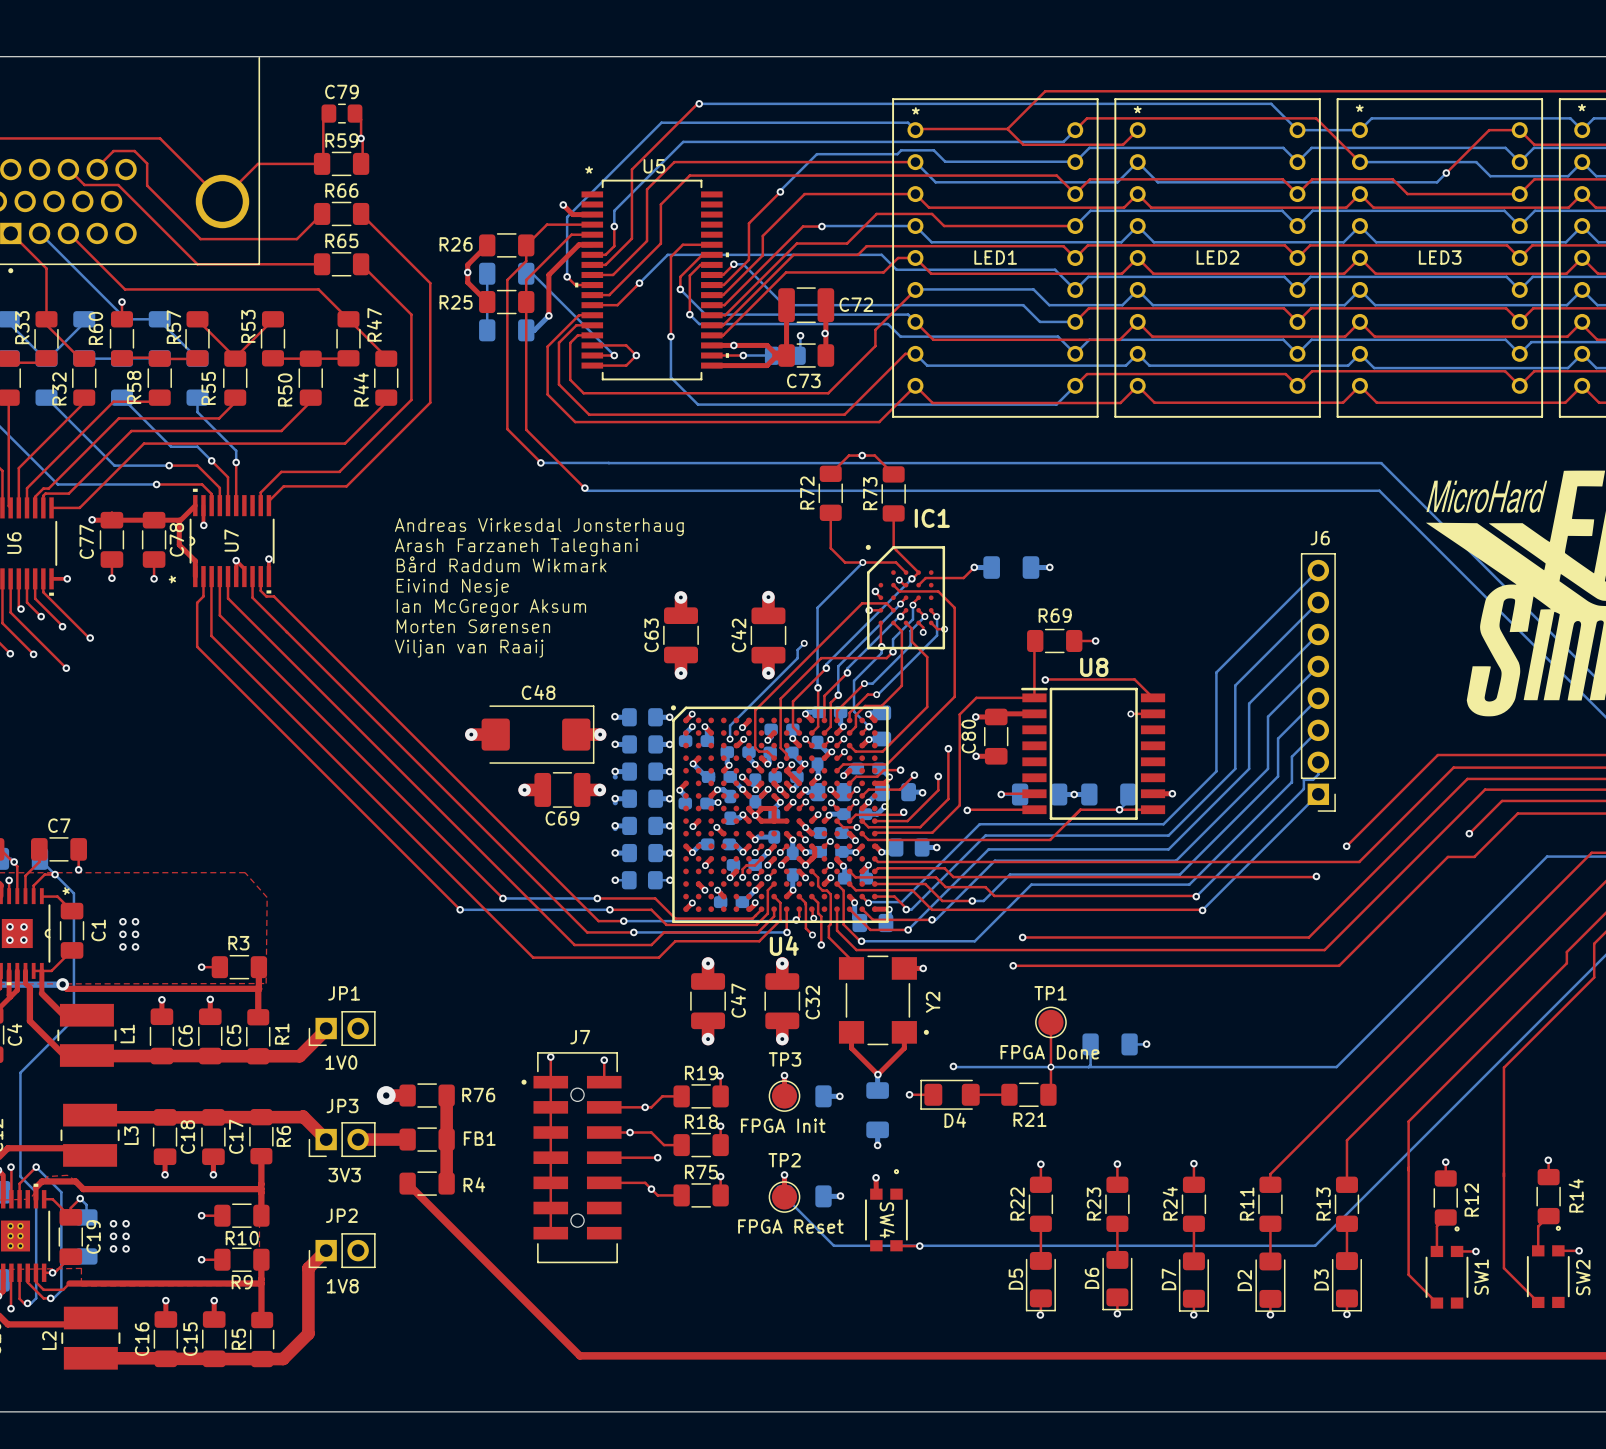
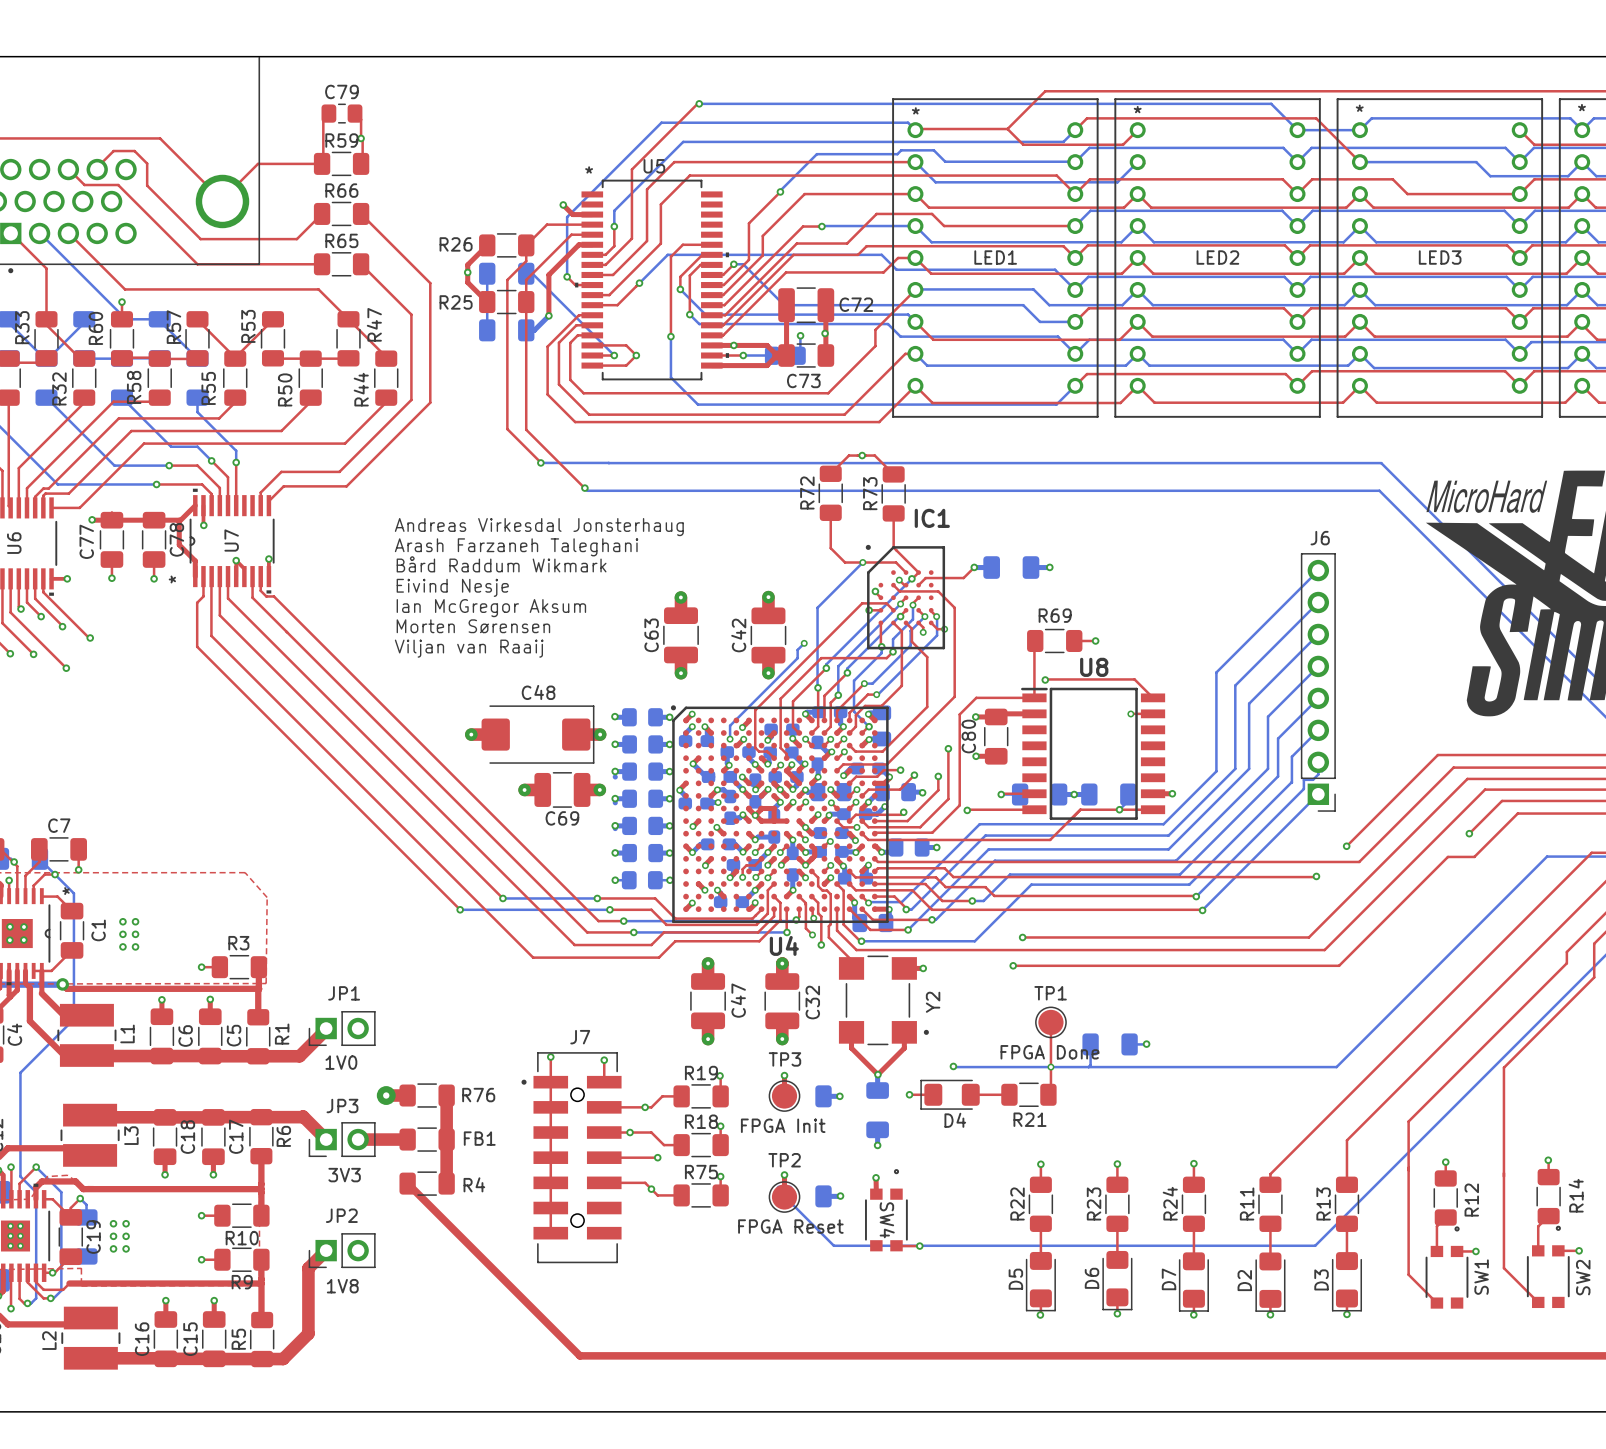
top track: (1519, 130) (1489, 130) (1446, 173) -> none
bottom track: (1137, 162) (1157, 182) (1437, 182) (1446, 173) -> none
via: (1446, 173) -> none

